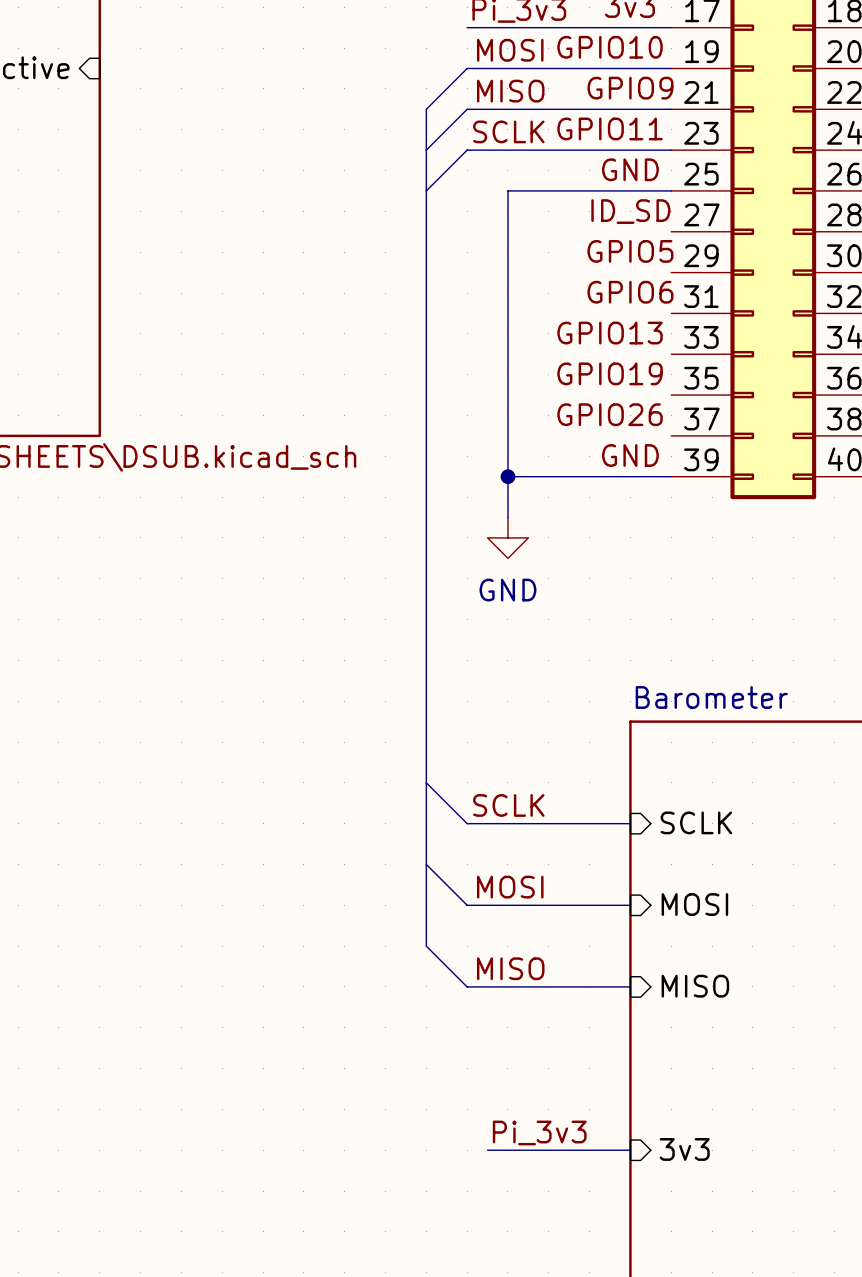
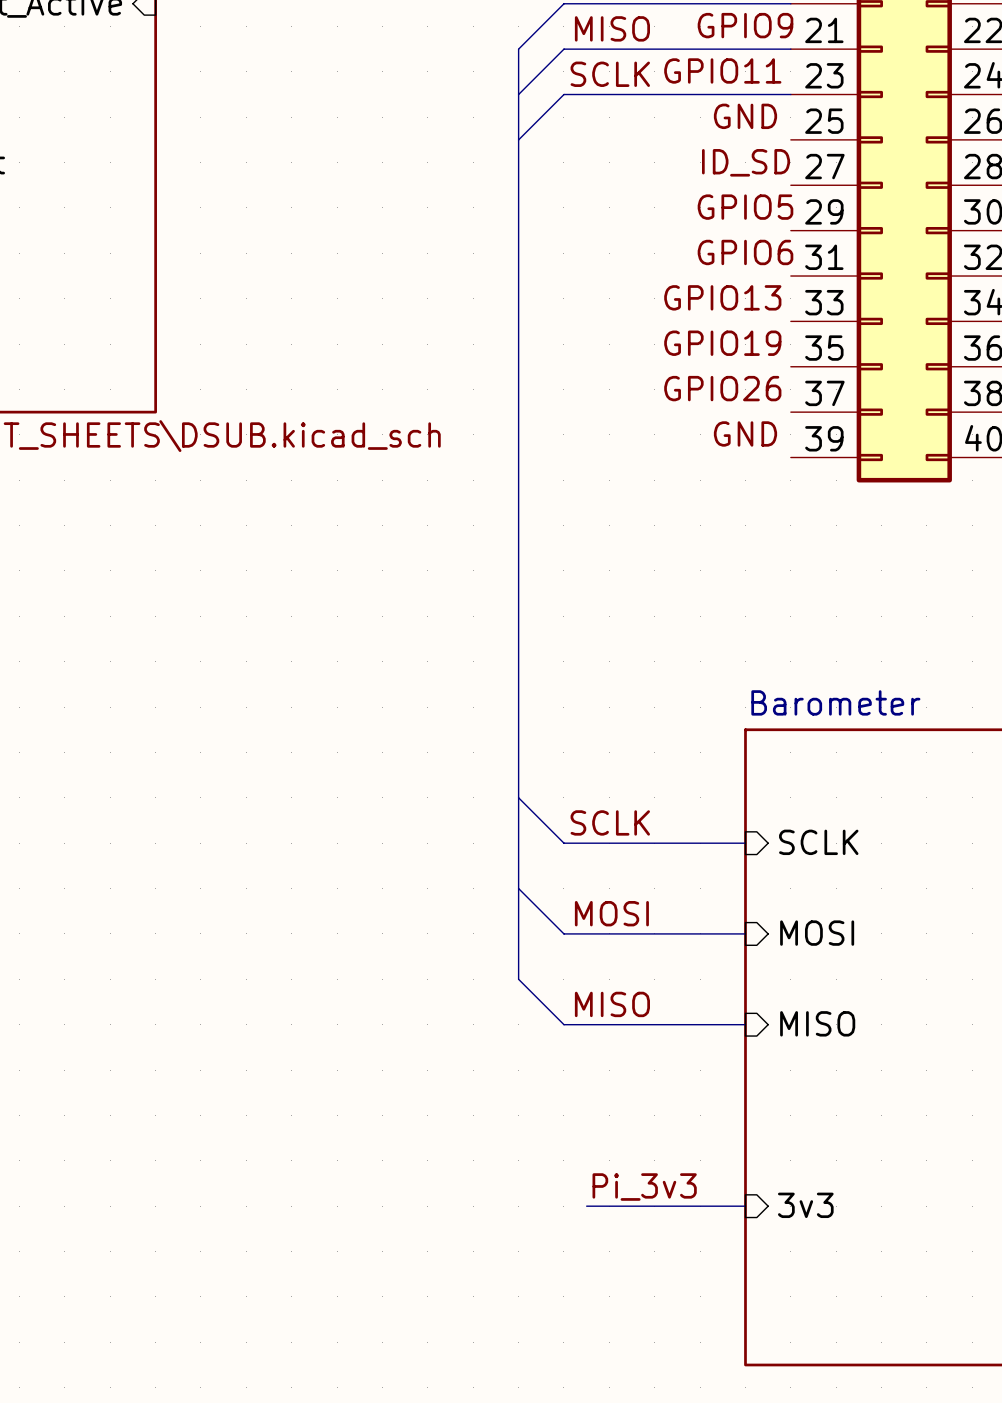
wire: (671, 190) (507, 190) (507, 517) -> none
wire: (507, 476) (671, 476) -> none
junction: (507, 476) -> none
power symbol: GND (507, 537) -> none

